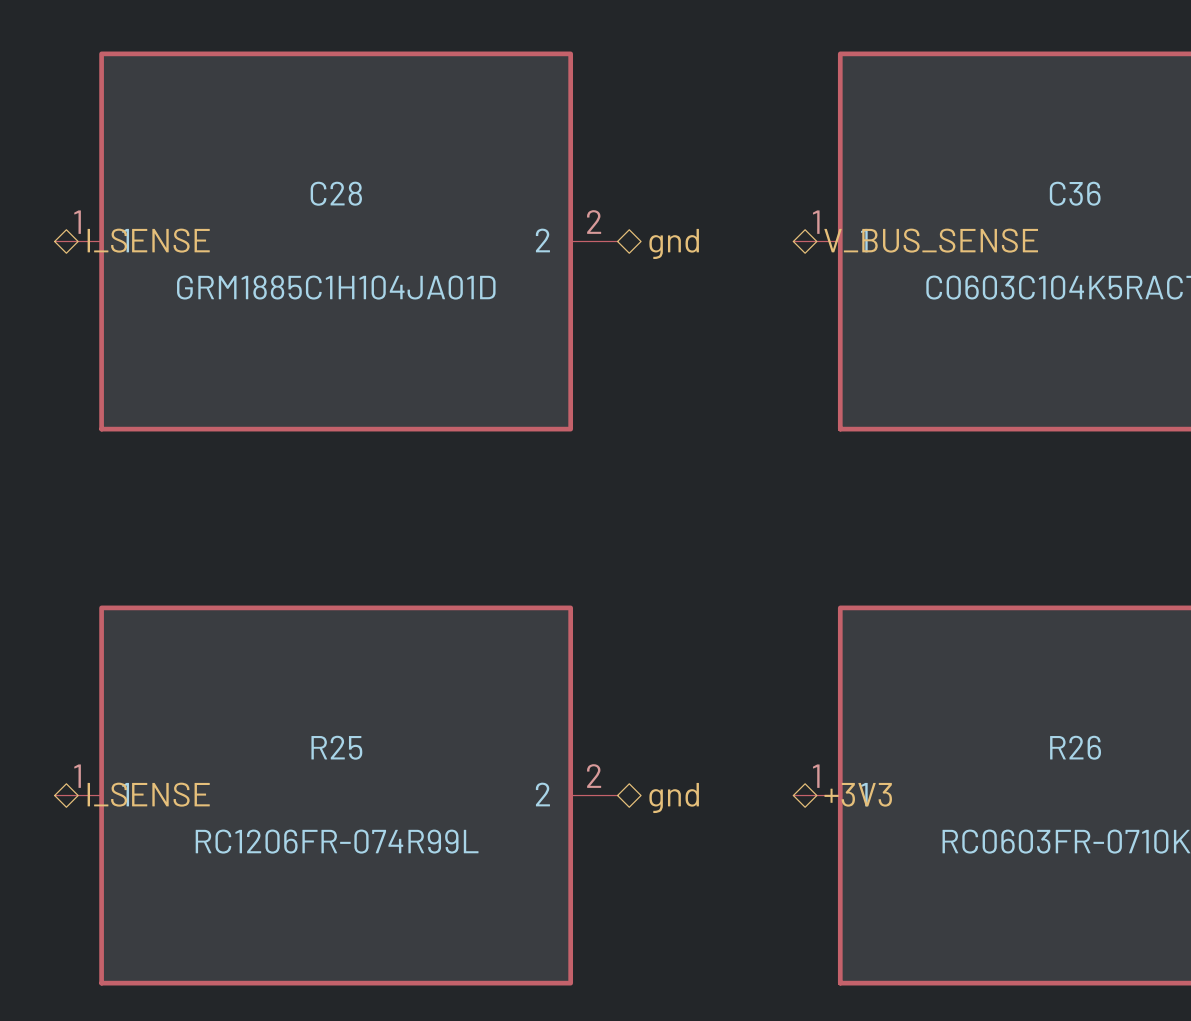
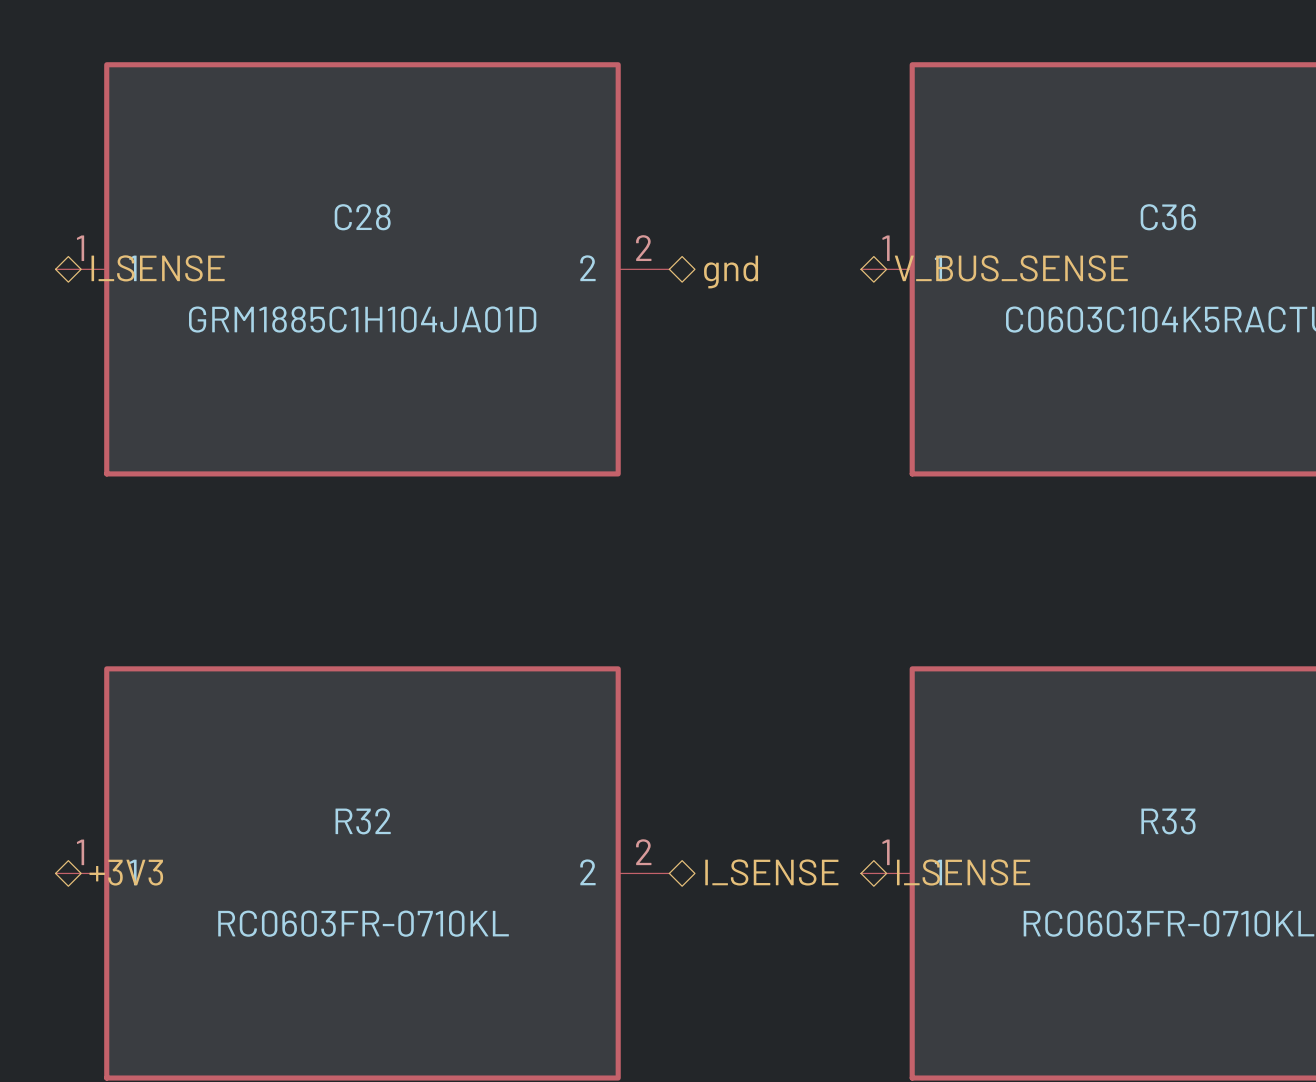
R25 name: R25 (336, 747) -> R32 (363, 821)
R26 name: R26 (1075, 747) -> R33 (1168, 821)
hierarchical label: I_SENSE (148, 794) -> +3V3 (126, 872)
hierarchical label: +3V3 (858, 794) -> I_SENSE (963, 872)
hierarchical label: gnd (674, 797) -> I_SENSE (771, 872)
R25 value: RC1206FR-074R99L (337, 841) -> RC0603FR-0710KL (363, 923)

